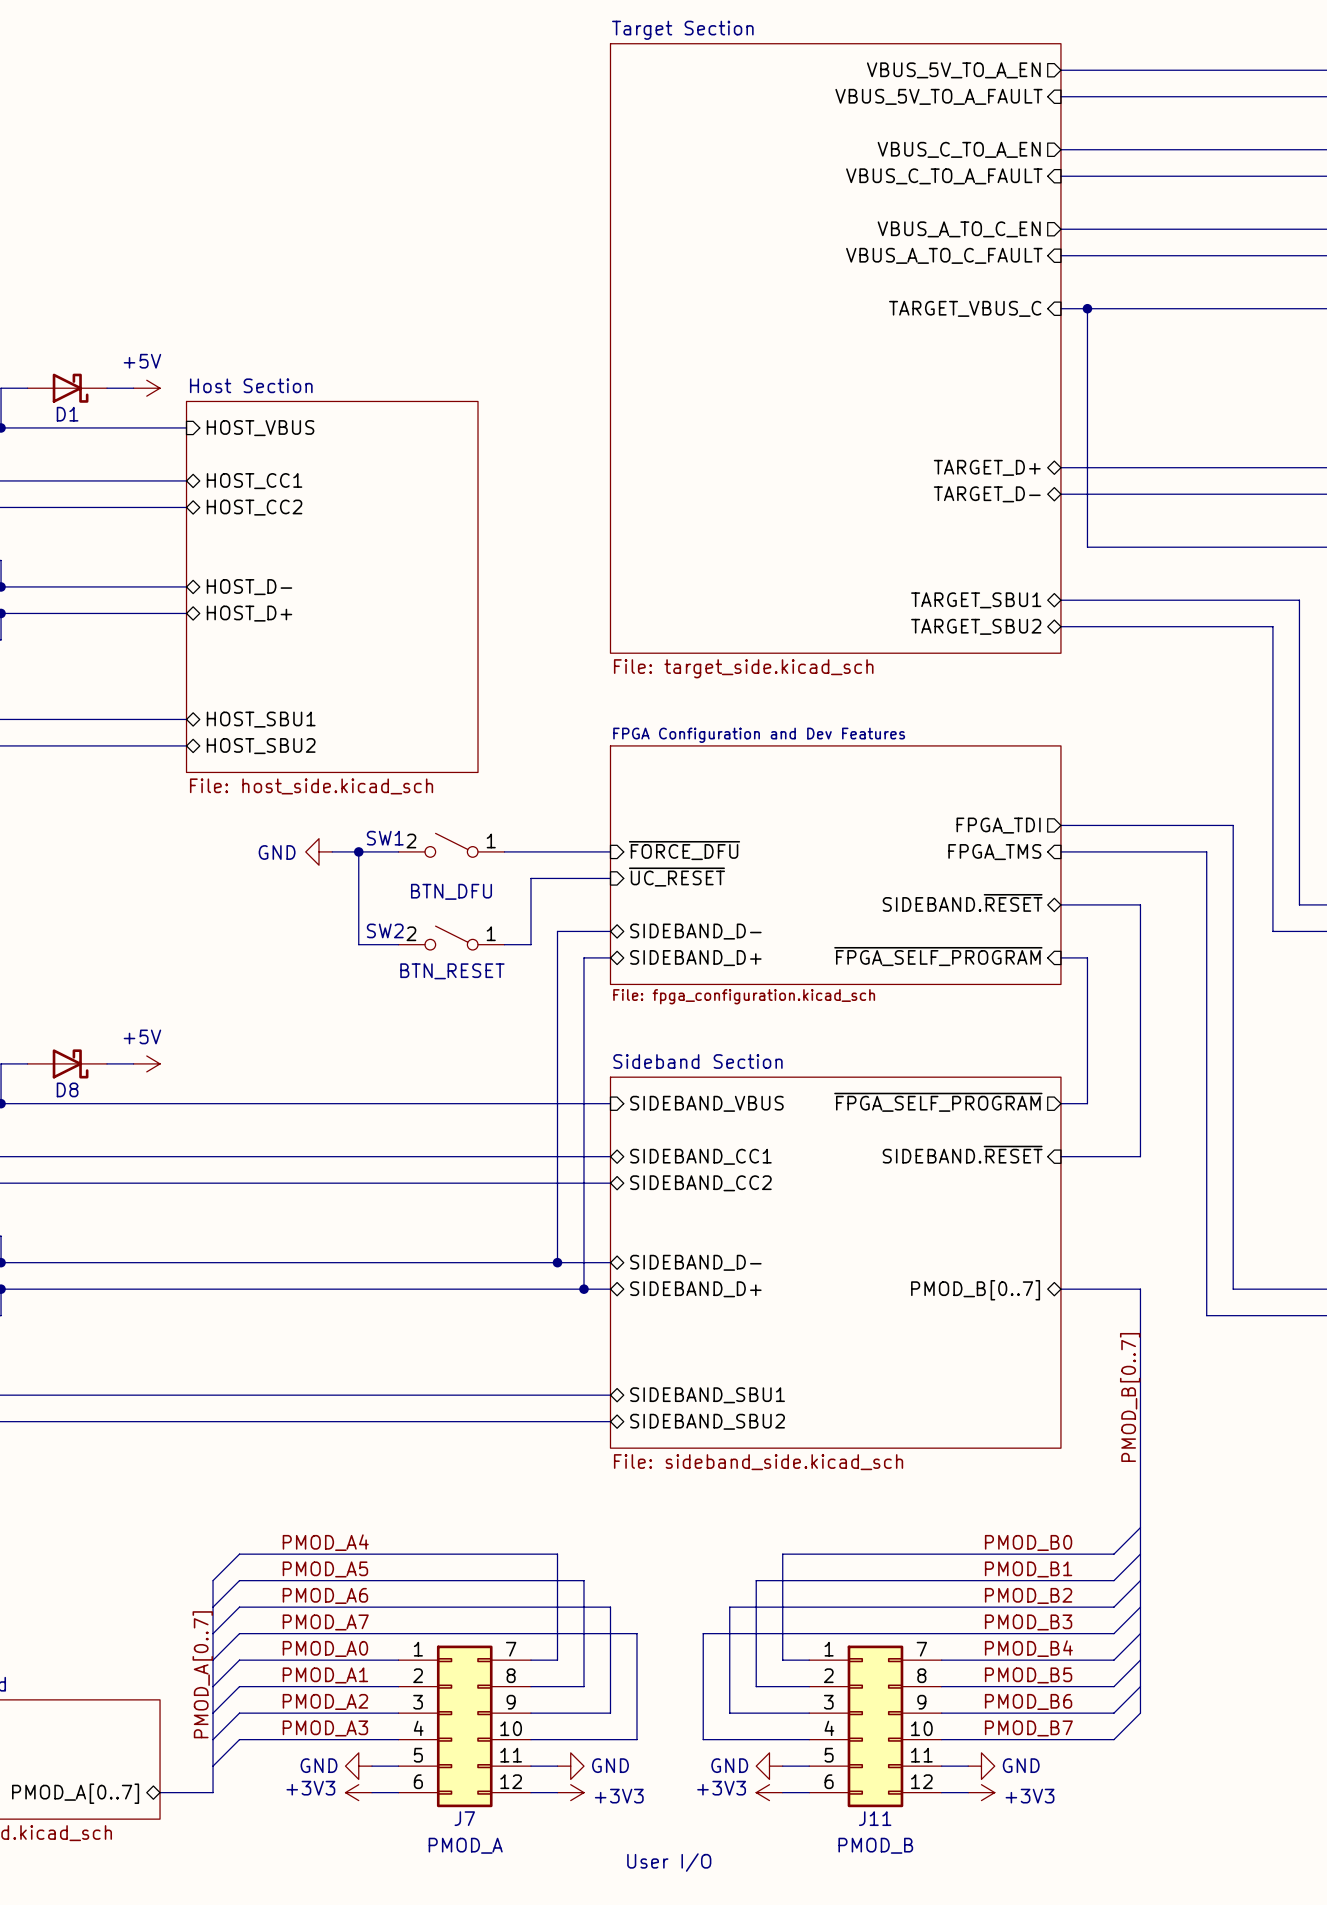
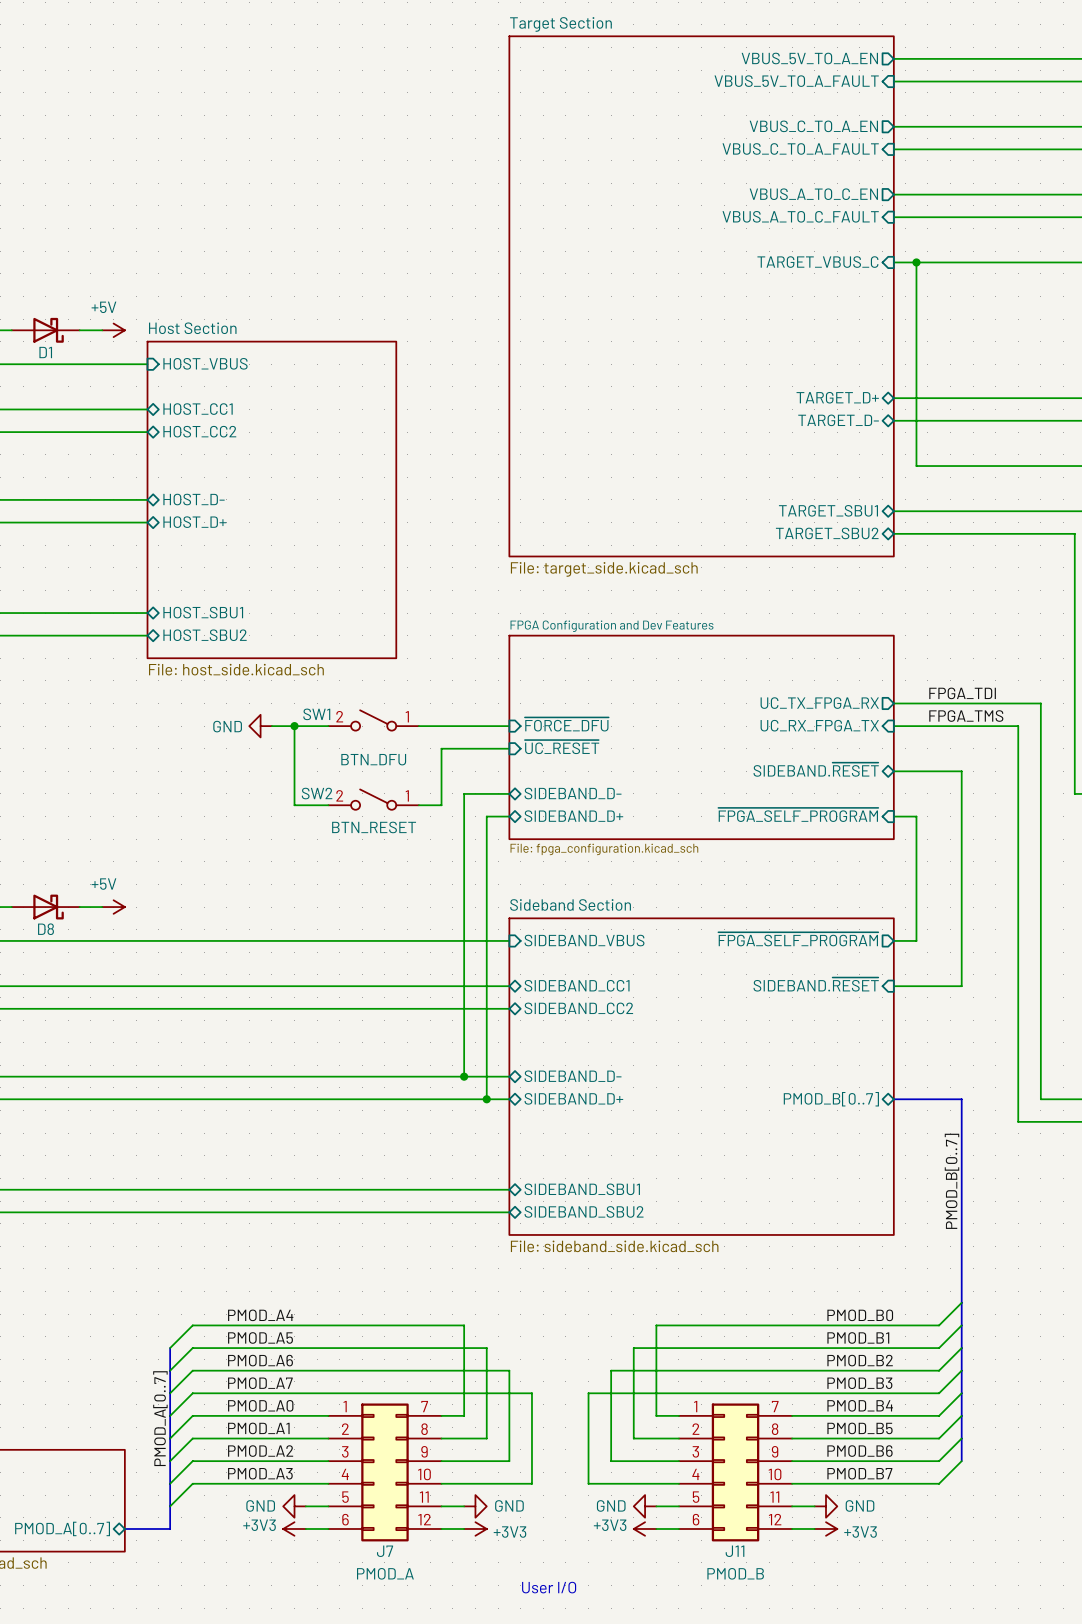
label: none -> FPGA_TDI (962, 693)
sheet pin: FPGA_TDI (998, 825) -> UC_TX_FPGA_RX (819, 703)
label: none -> FPGA_TMS (966, 716)
sheet pin: FPGA_TMS (994, 852) -> UC_RX_FPGA_TX (819, 725)

